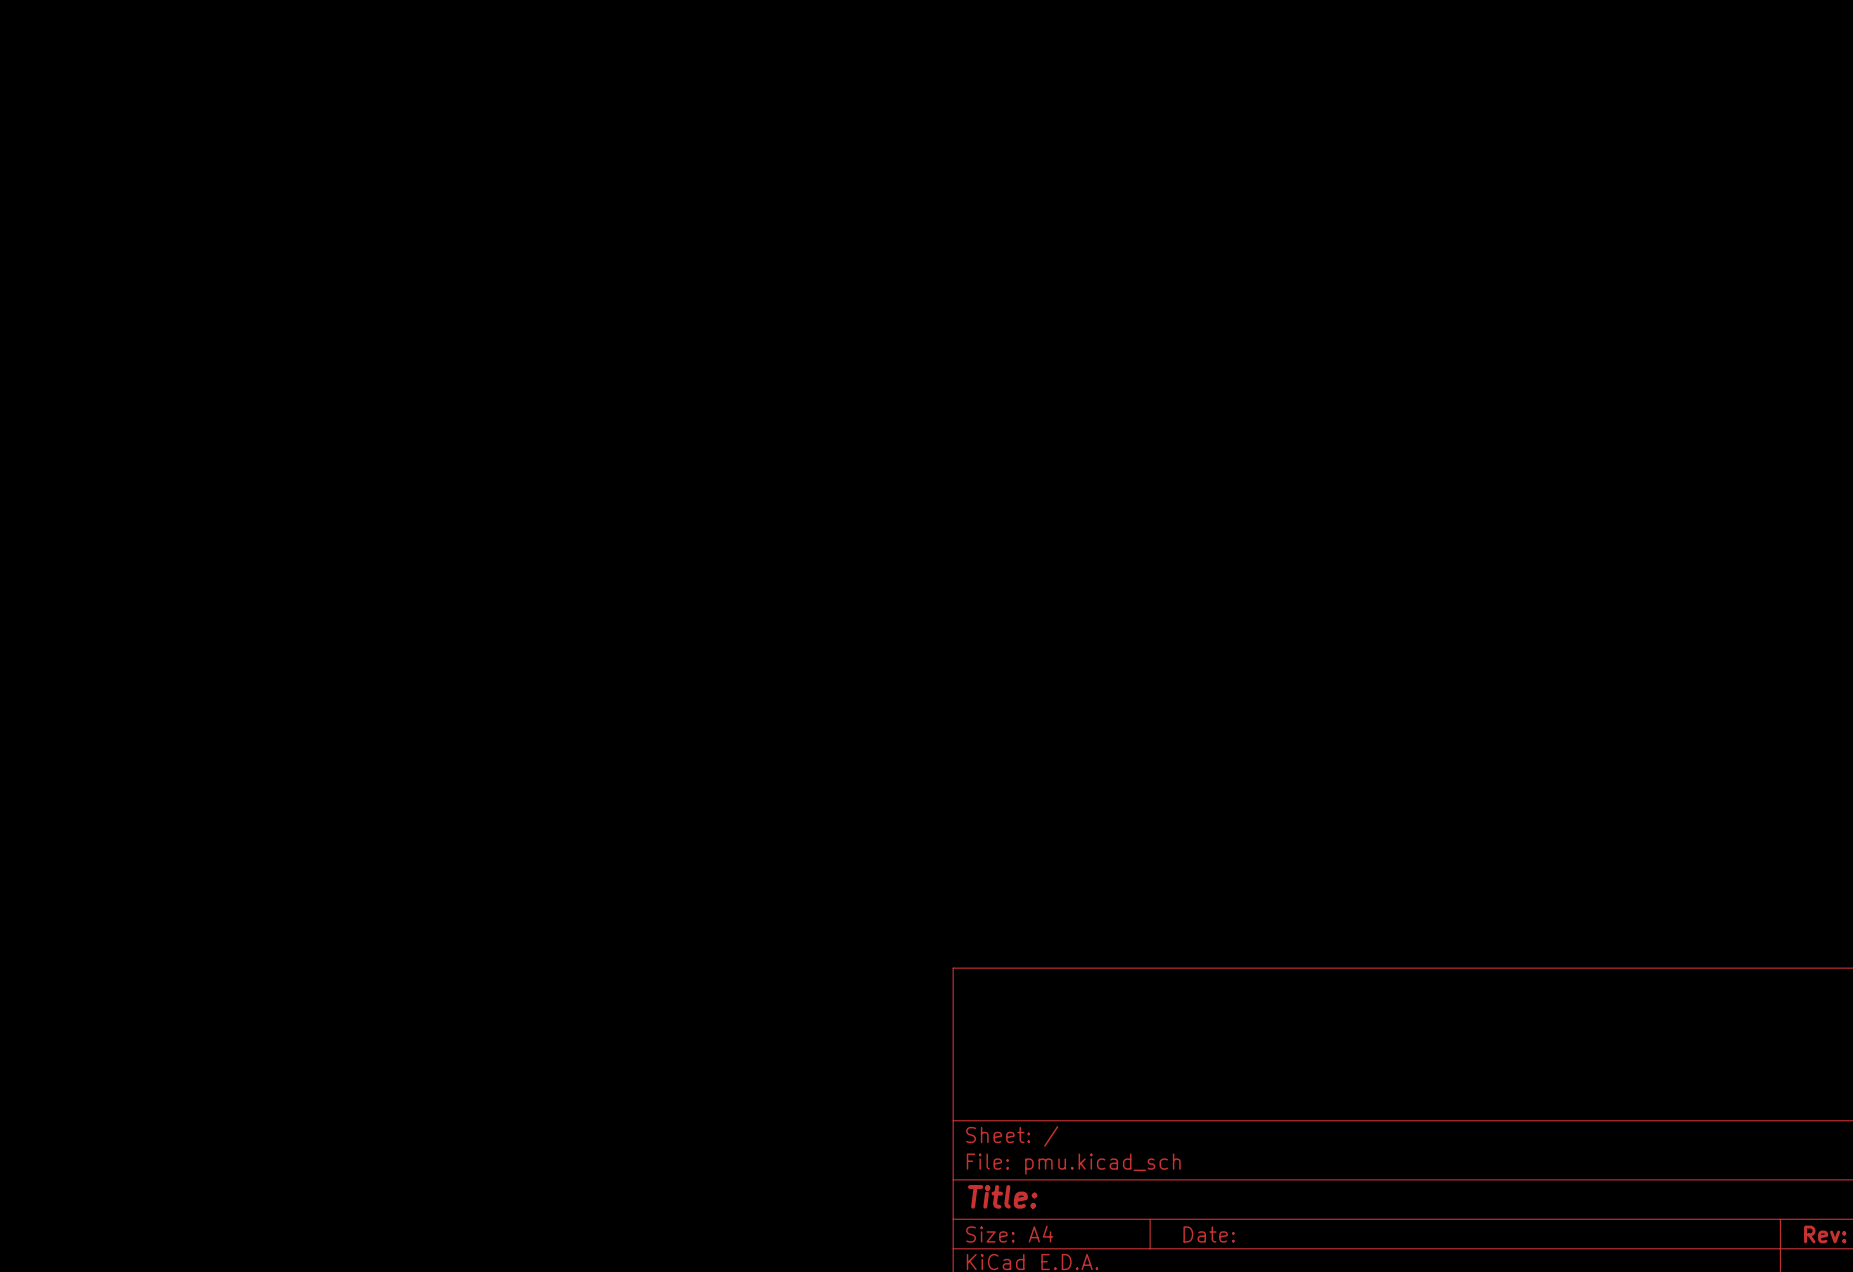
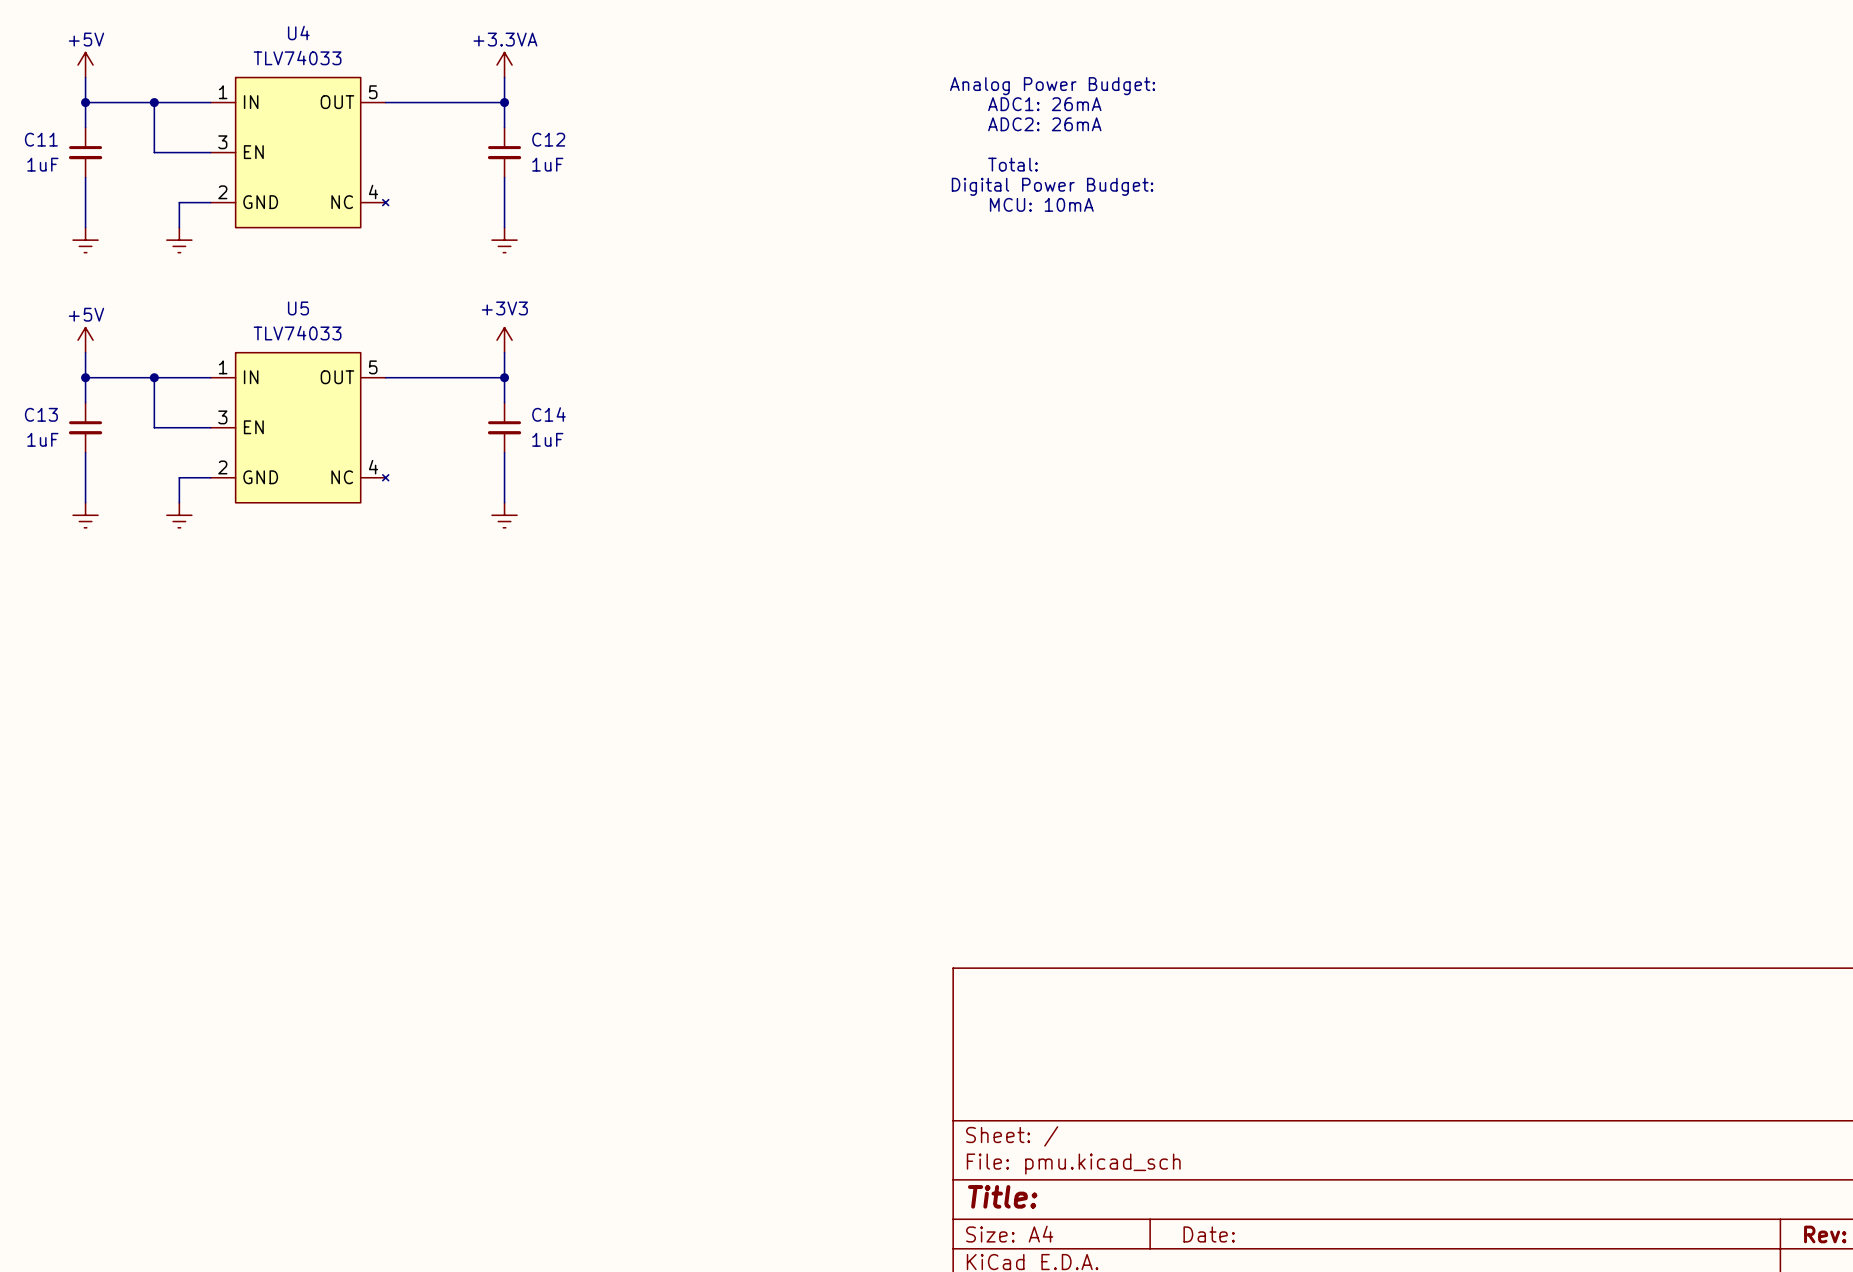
power symbol: none -> +5V (85, 65)
power symbol: none -> +3.3VA (504, 65)
wire: none -> (85, 77) (85, 127)
wire: none -> (504, 77) (504, 127)
text: none -> Analog Power Budget: (1052, 86)
wire: none -> (85, 102) (210, 102)
junction: none -> (85, 102)
wire: none -> (154, 102) (154, 152) (210, 152)
junction: none -> (154, 102)
wire: none -> (385, 102) (504, 102)
junction: none -> (504, 102)
text: none -> ADC1: 26mA (1044, 104)
text: none -> ADC2: 26mA (1044, 124)
C11: none -> 1uF (85, 152)
U4: none -> TLV74033 (299, 152)
C12: none -> 1uF (504, 152)
text: none -> Total: (1012, 164)
wire: none -> (85, 177) (85, 227)
wire: none -> (504, 177) (504, 227)
text: none -> Digital Power Budget: (1052, 186)
wire: none -> (210, 202) (179, 202) (179, 227)
text: none -> MCU: 10mA (1041, 204)
power symbol: none -> (85, 240)
power symbol: none -> (179, 240)
power symbol: none -> (504, 240)
power symbol: none -> +5V (85, 340)
power symbol: none -> +3V3 (504, 340)
wire: none -> (85, 352) (85, 402)
wire: none -> (504, 352) (504, 402)
wire: none -> (85, 377) (210, 377)
junction: none -> (85, 377)
wire: none -> (154, 377) (154, 427) (210, 427)
junction: none -> (154, 377)
wire: none -> (385, 377) (504, 377)
junction: none -> (504, 377)
C13: none -> 1uF (85, 427)
U5: none -> TLV74033 (299, 427)
C14: none -> 1uF (504, 427)
wire: none -> (85, 452) (85, 502)
wire: none -> (504, 452) (504, 502)
wire: none -> (210, 477) (179, 477) (179, 502)
power symbol: none -> (85, 515)
power symbol: none -> (179, 515)
power symbol: none -> (504, 515)

